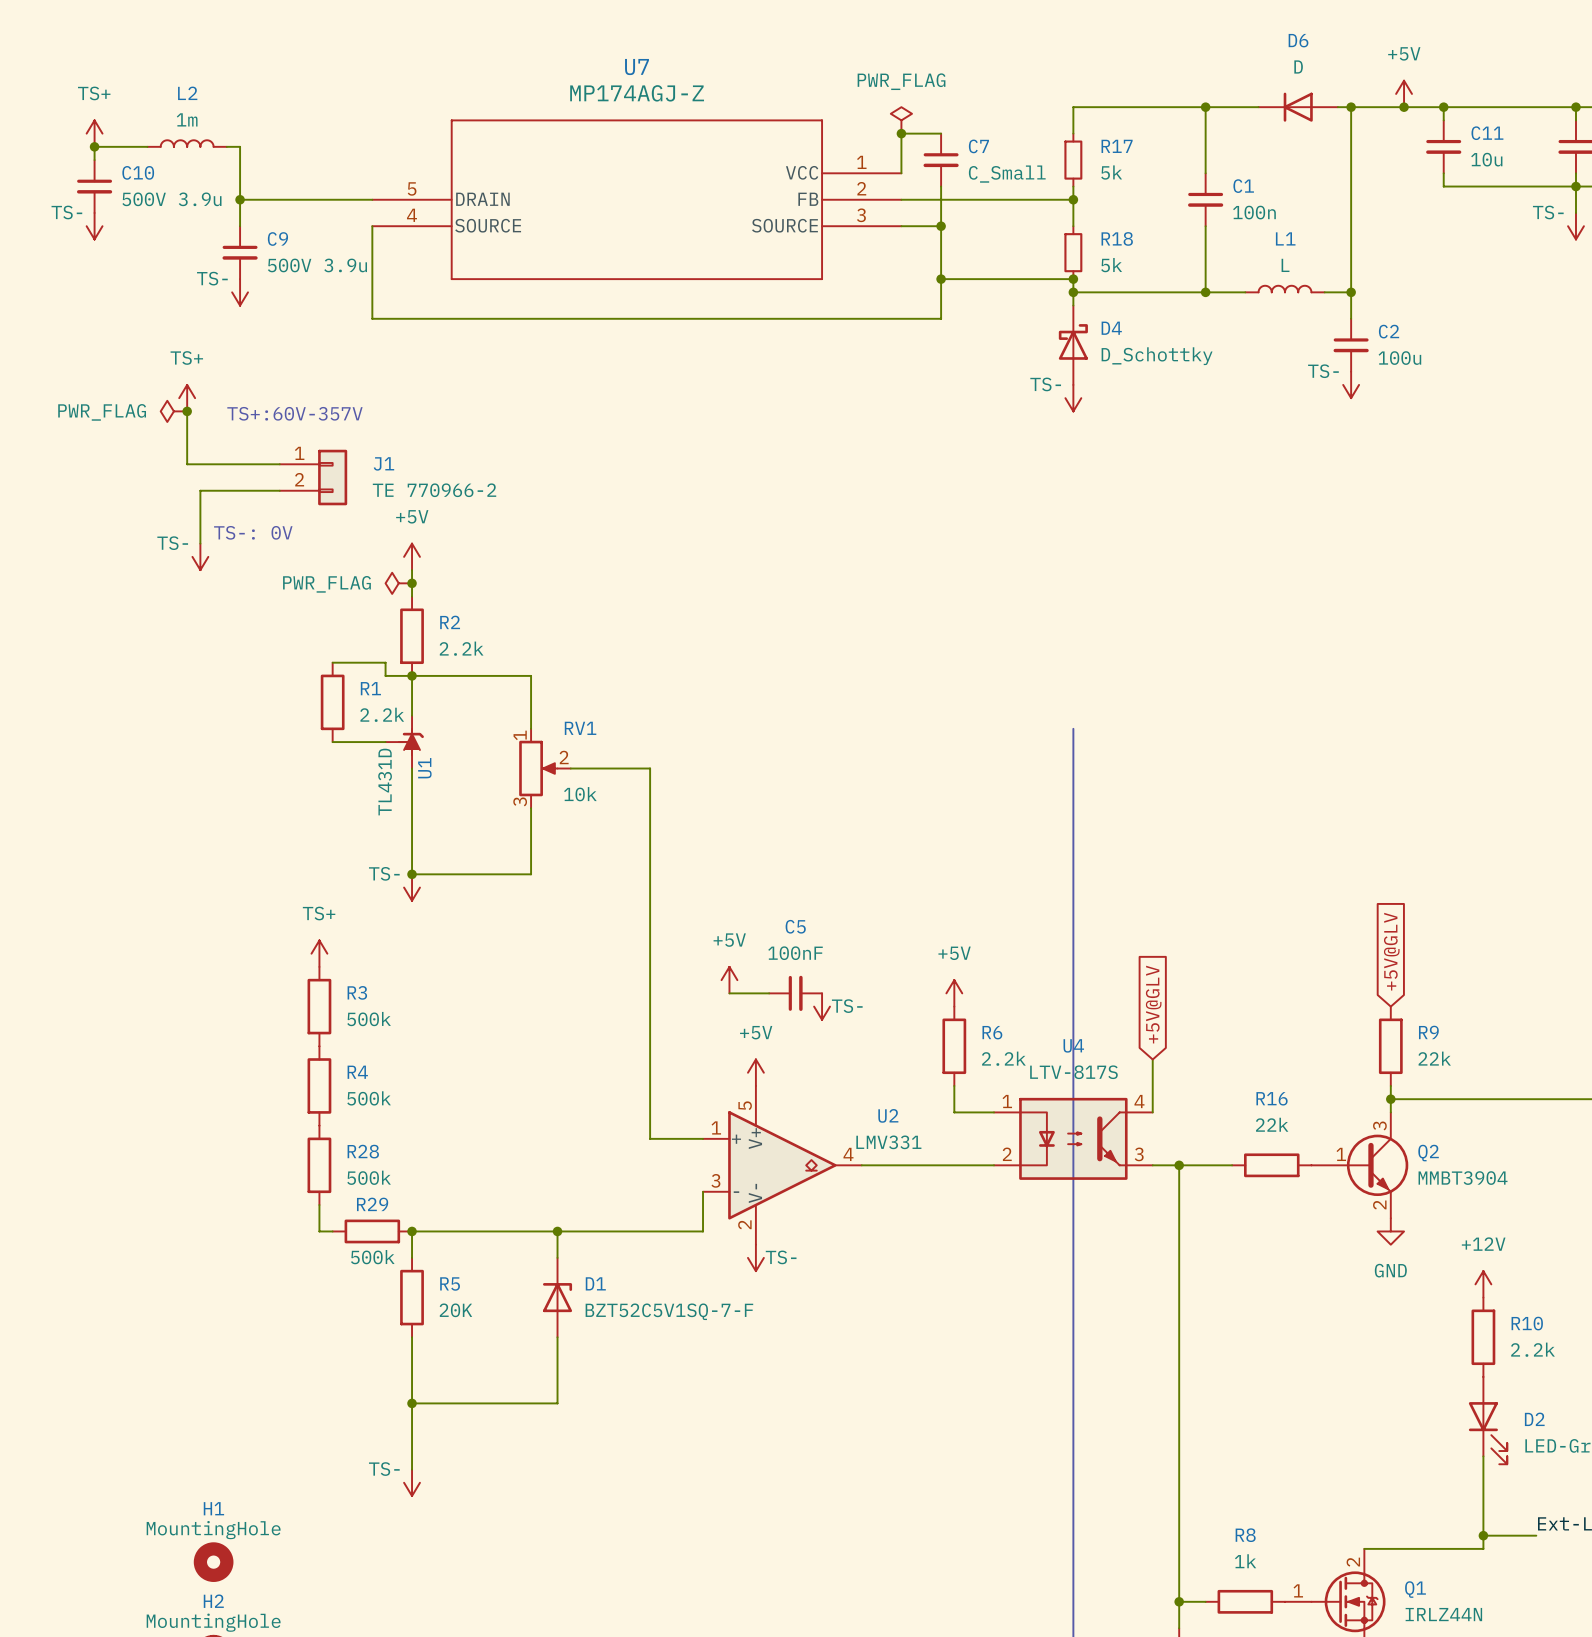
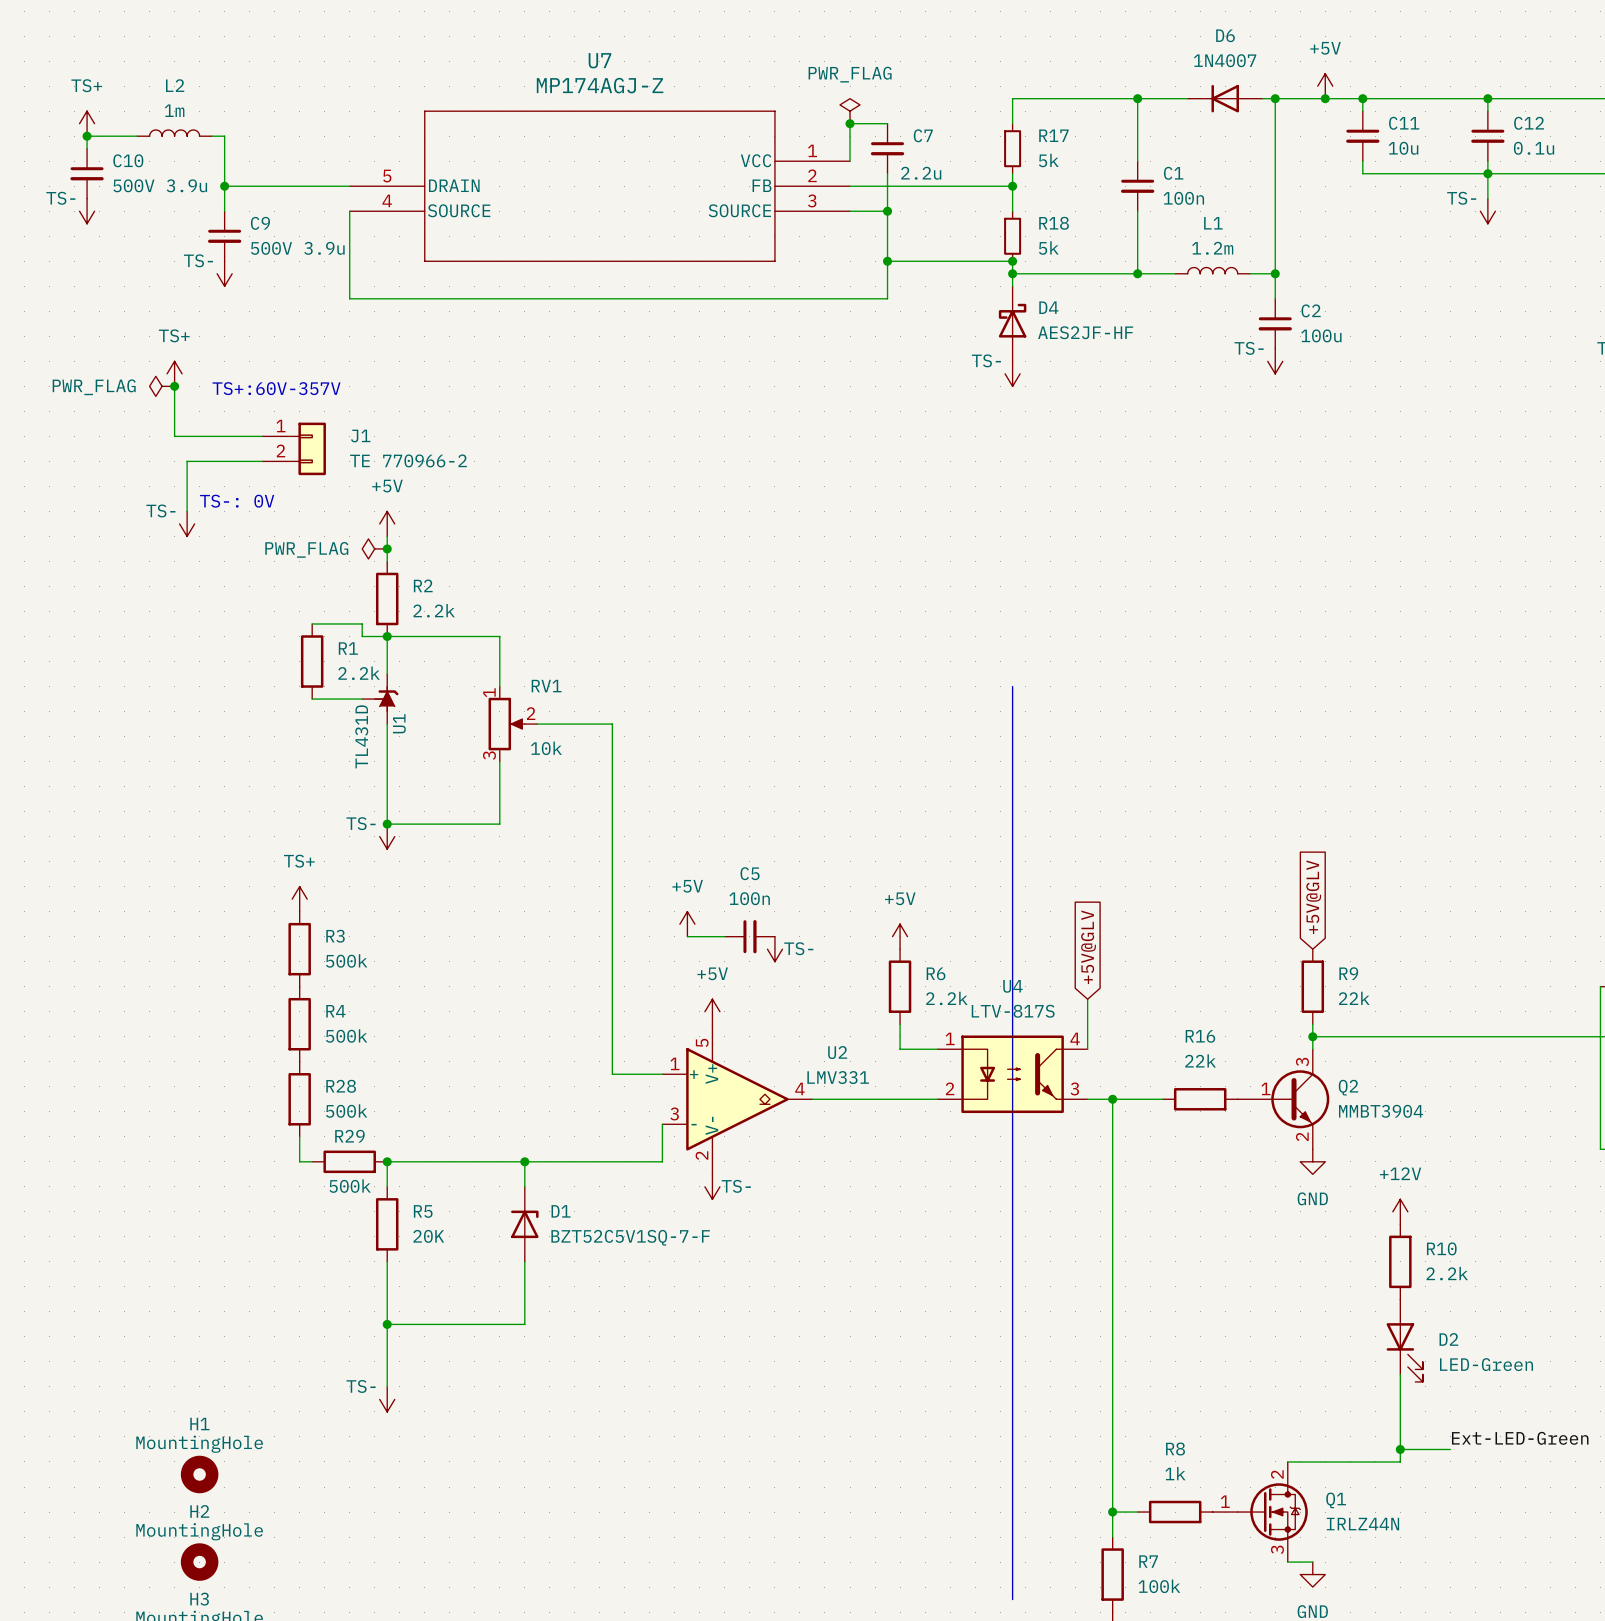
D6 value: D (1298, 66) -> 1N4007 (1225, 60)
C7 value: C_Small (1007, 174) -> 2.2u (921, 173)
L1 value: L (1285, 265) -> 1.2m (1212, 248)
D4 value: D_Schottky (1157, 356) -> AES2JF-HF (1085, 332)
C5 value: 100nF (795, 953) -> 100n (749, 898)

